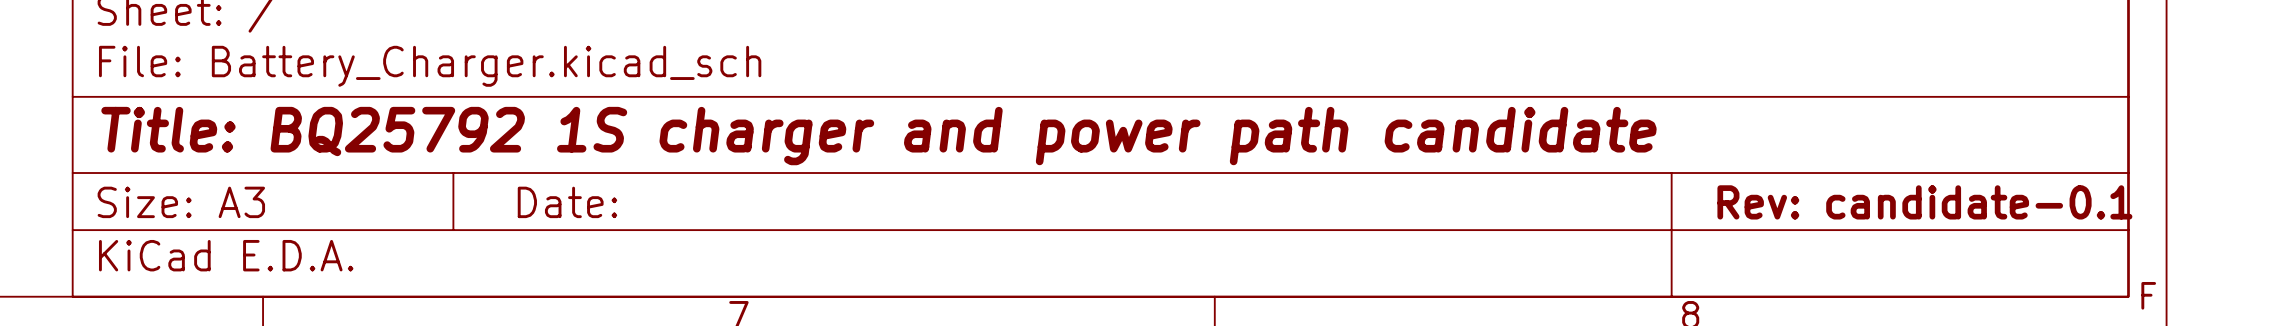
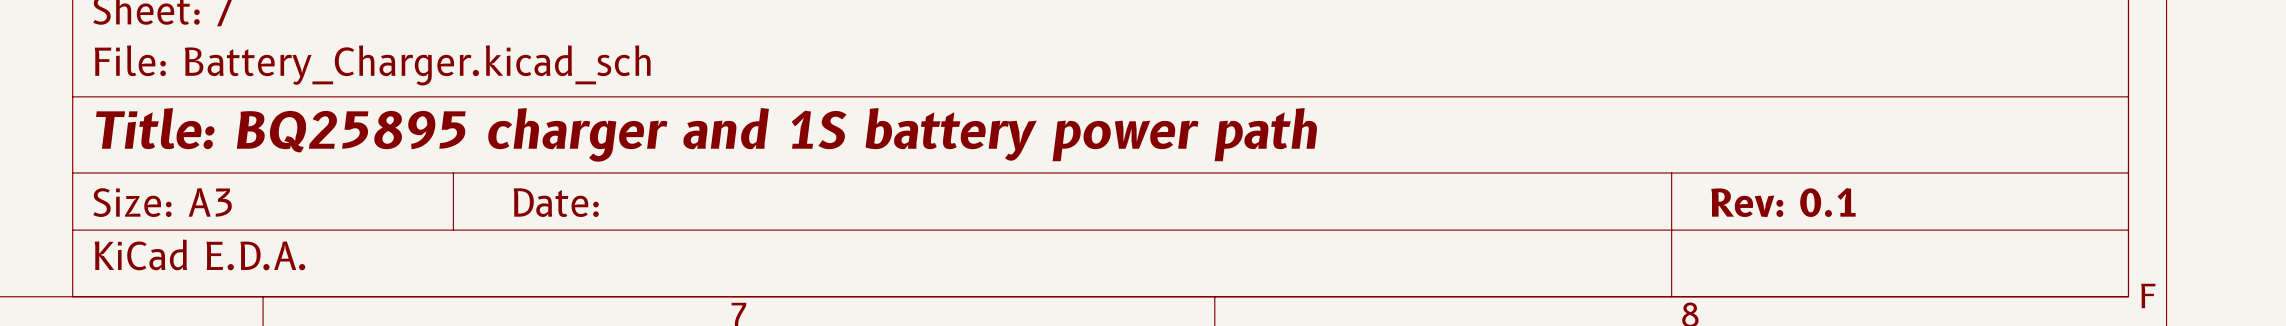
title block: Title: BQ25792 1S charger and power path candidate (878, 136) -> Title: BQ25895 charger and 1S battery power path (706, 134)
title block: Rev: candidate-0.1 (1924, 202) -> Rev: 0.1 (1783, 202)

